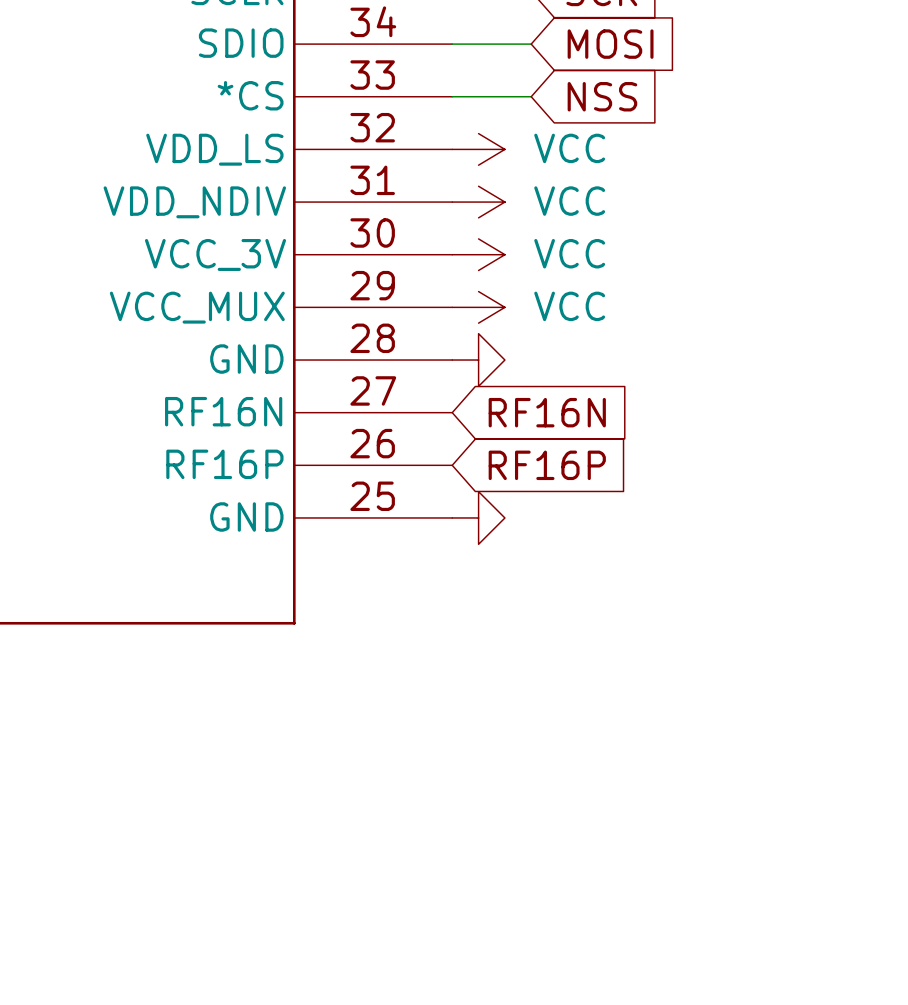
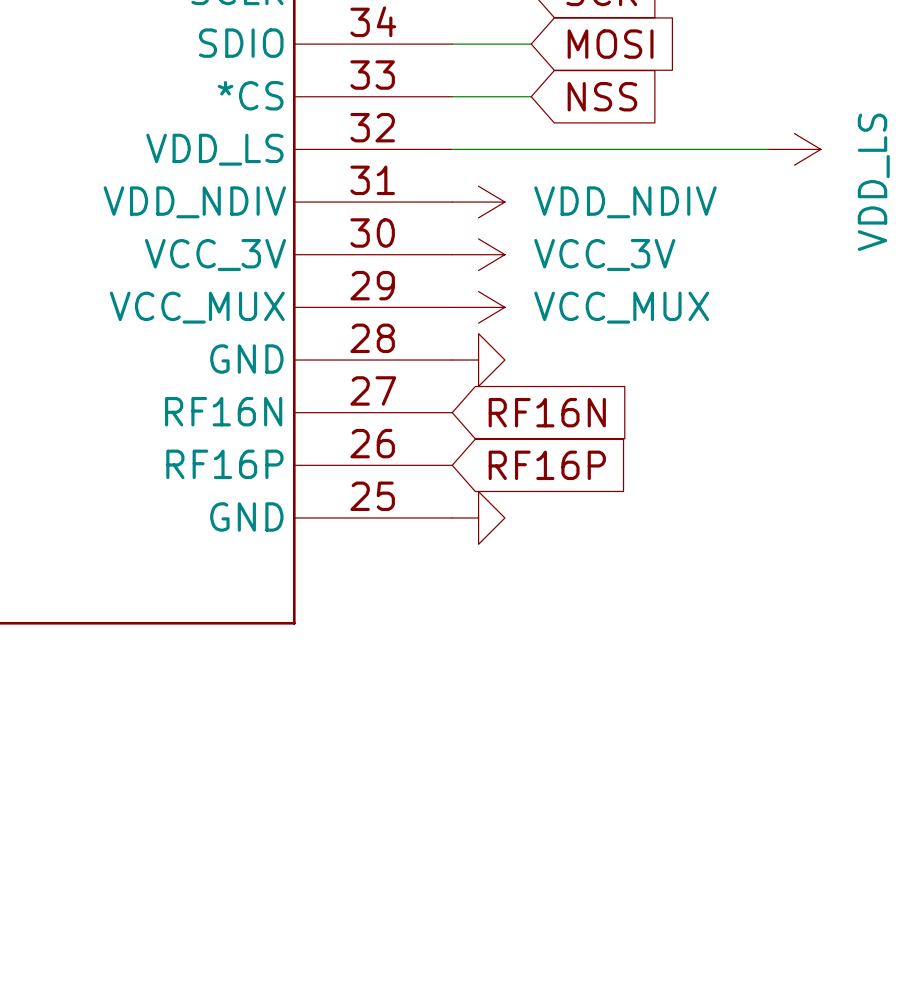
wire: none -> (452, 149) (768, 149)
power symbol: VCC (478, 149) -> none
power symbol: none -> VDD_LS (794, 149)
power symbol: VCC (478, 202) -> VDD_NDIV (478, 202)
power symbol: VCC (478, 254) -> VCC_3V (478, 254)
power symbol: VCC (478, 307) -> VCC_MUX (478, 307)

